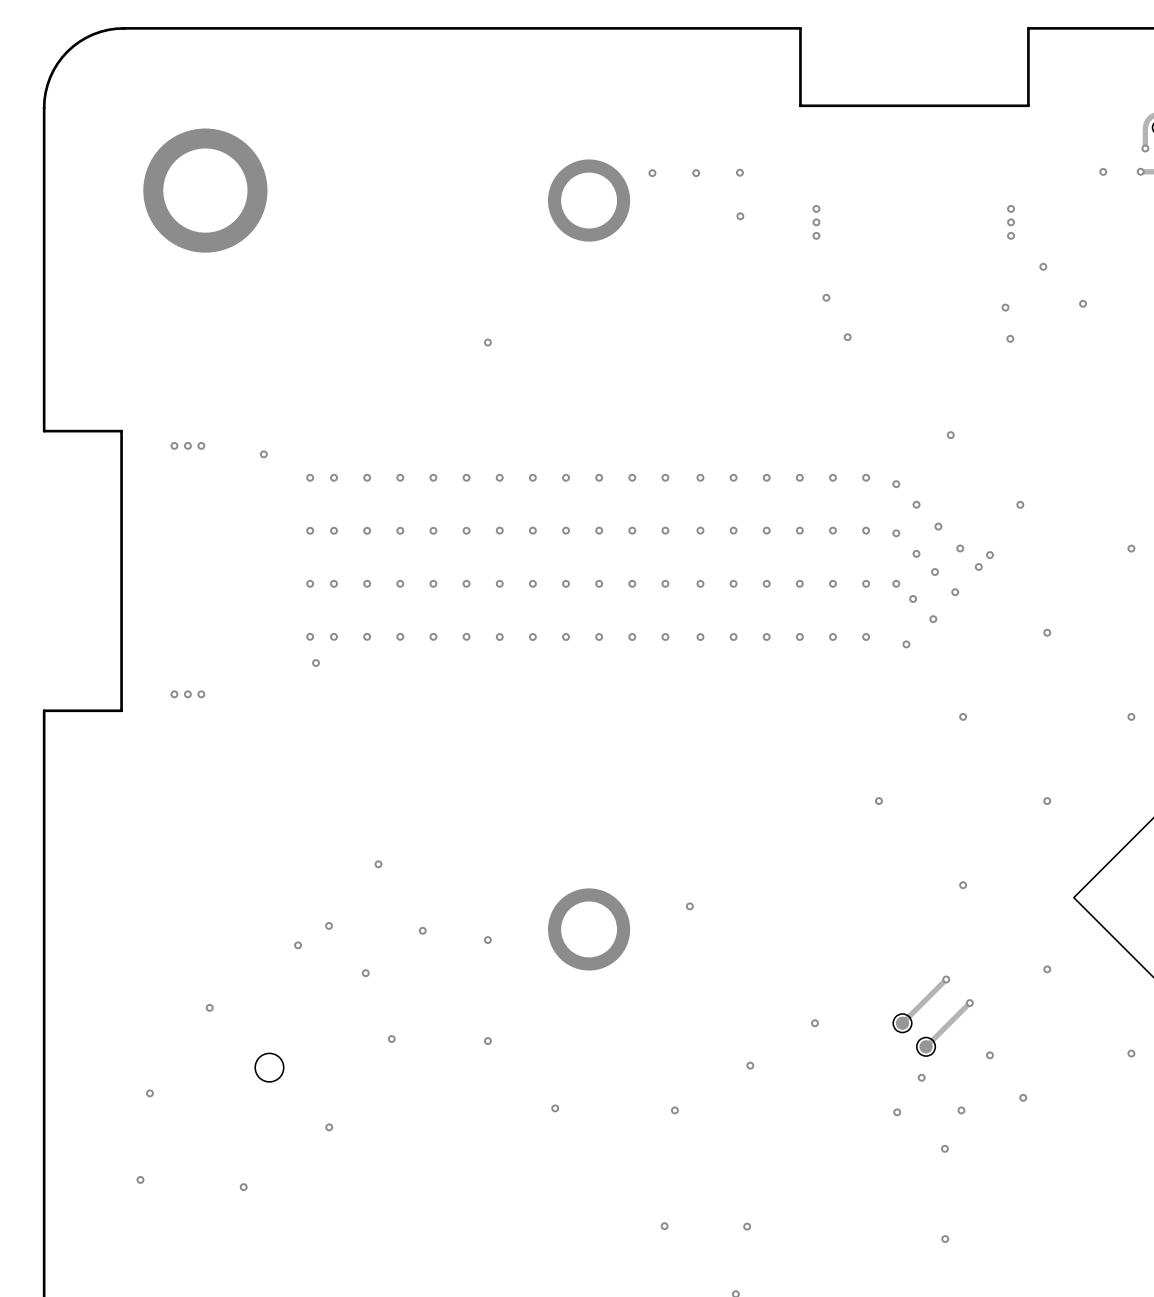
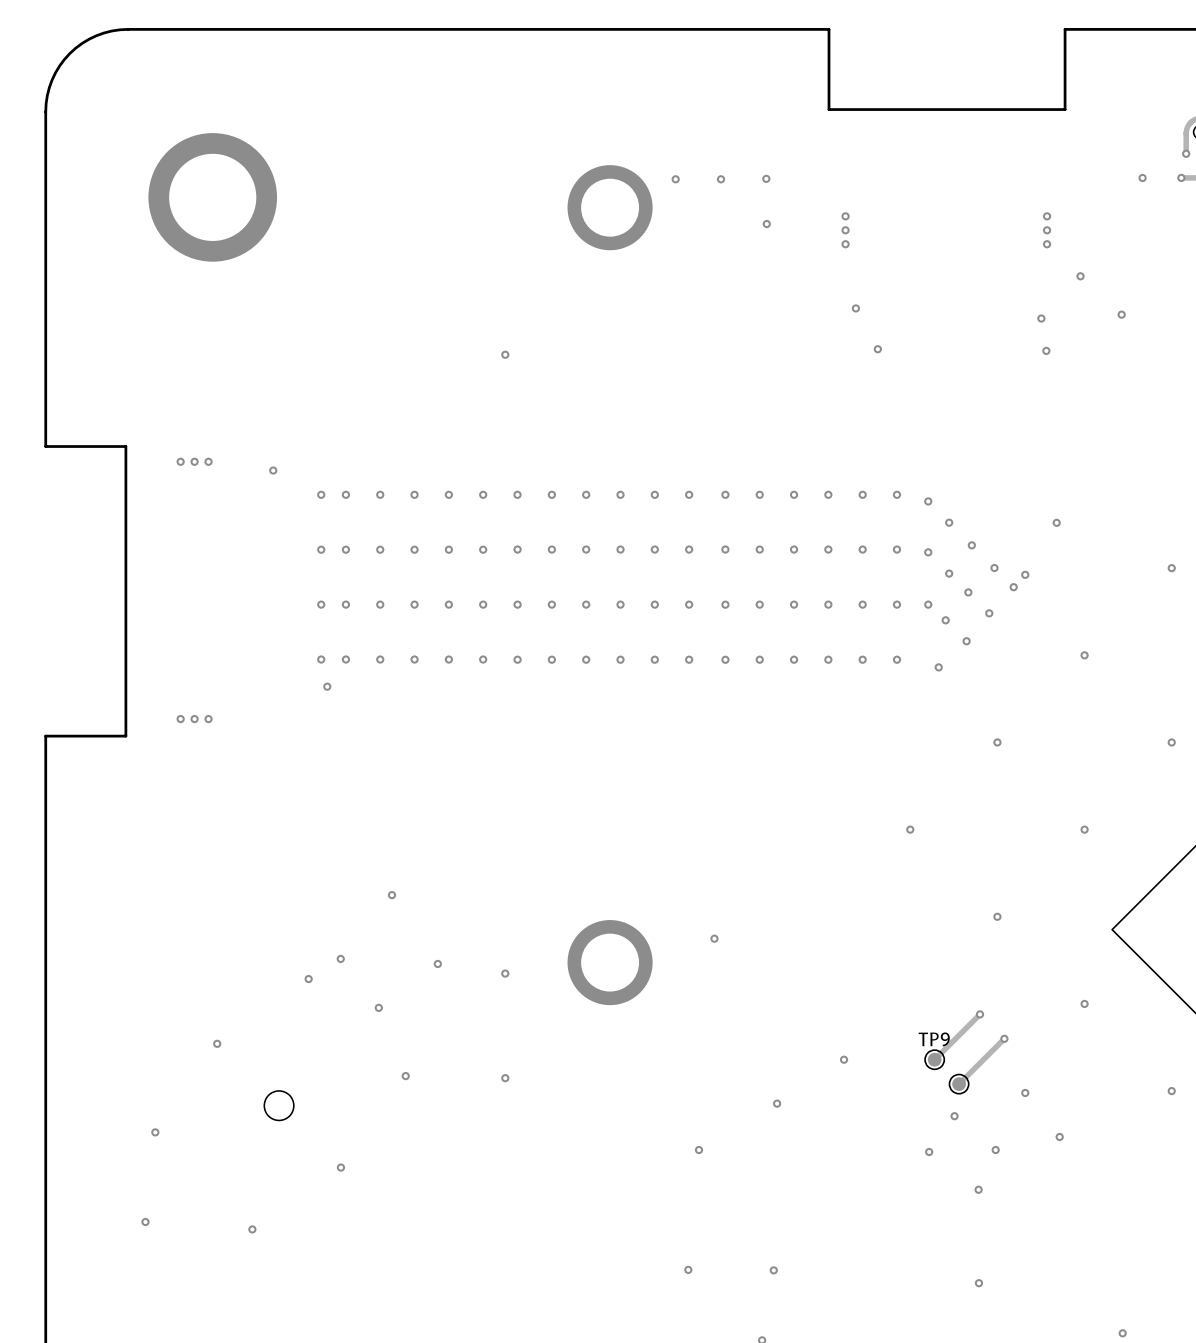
via: (950, 435) -> none
TP9 name: none -> TP9 (934, 1039)
via: (555, 1108) -> none
via: none -> (1122, 1333)

